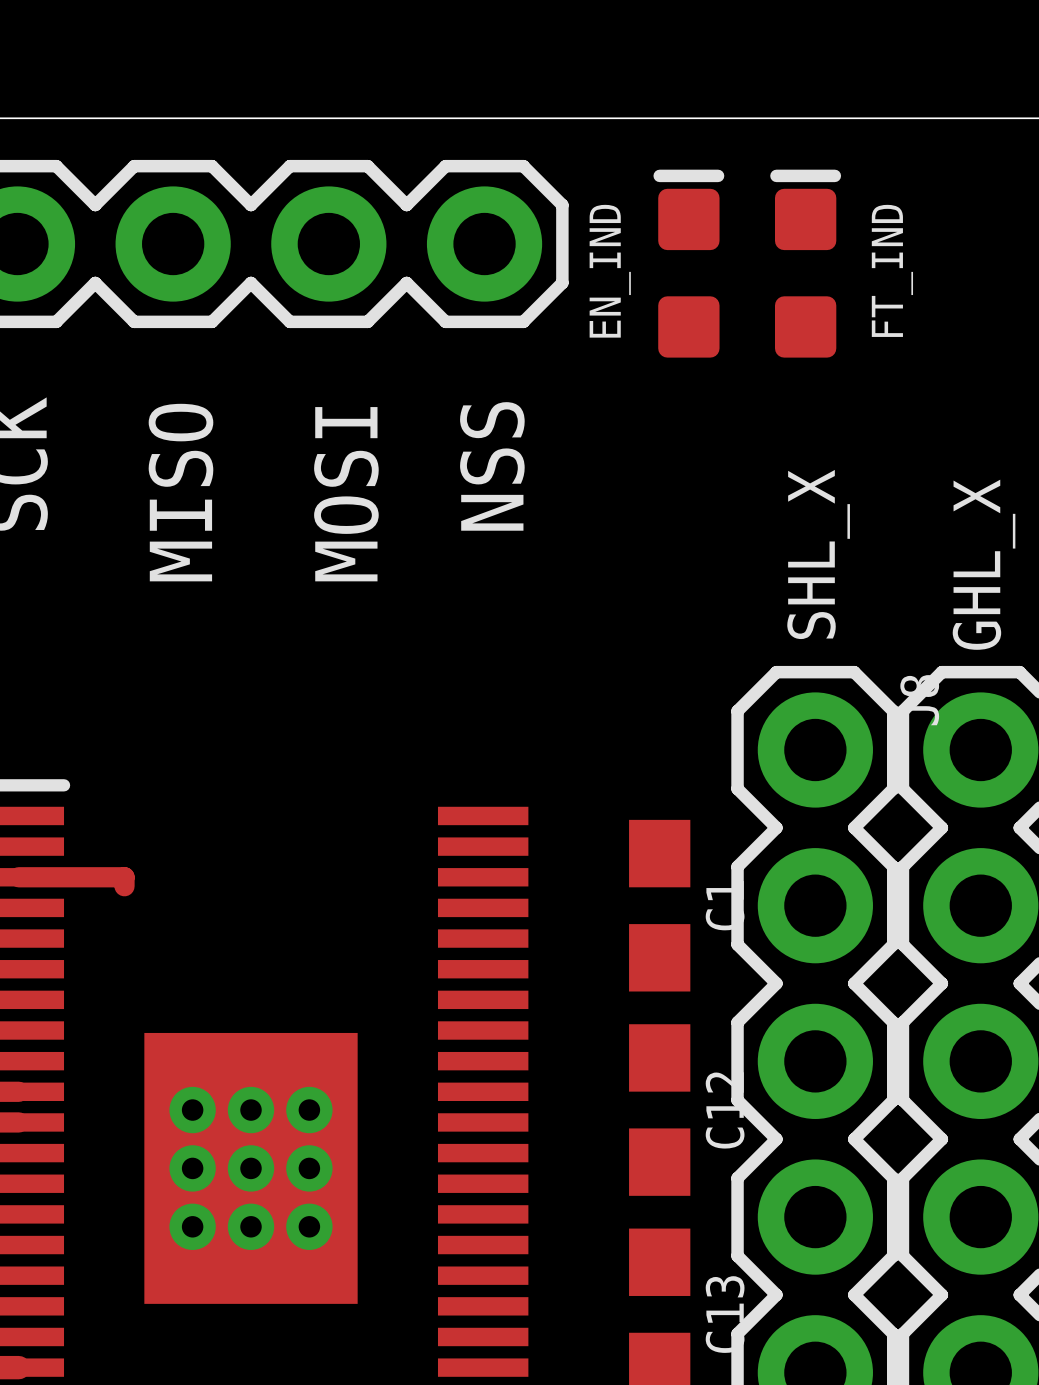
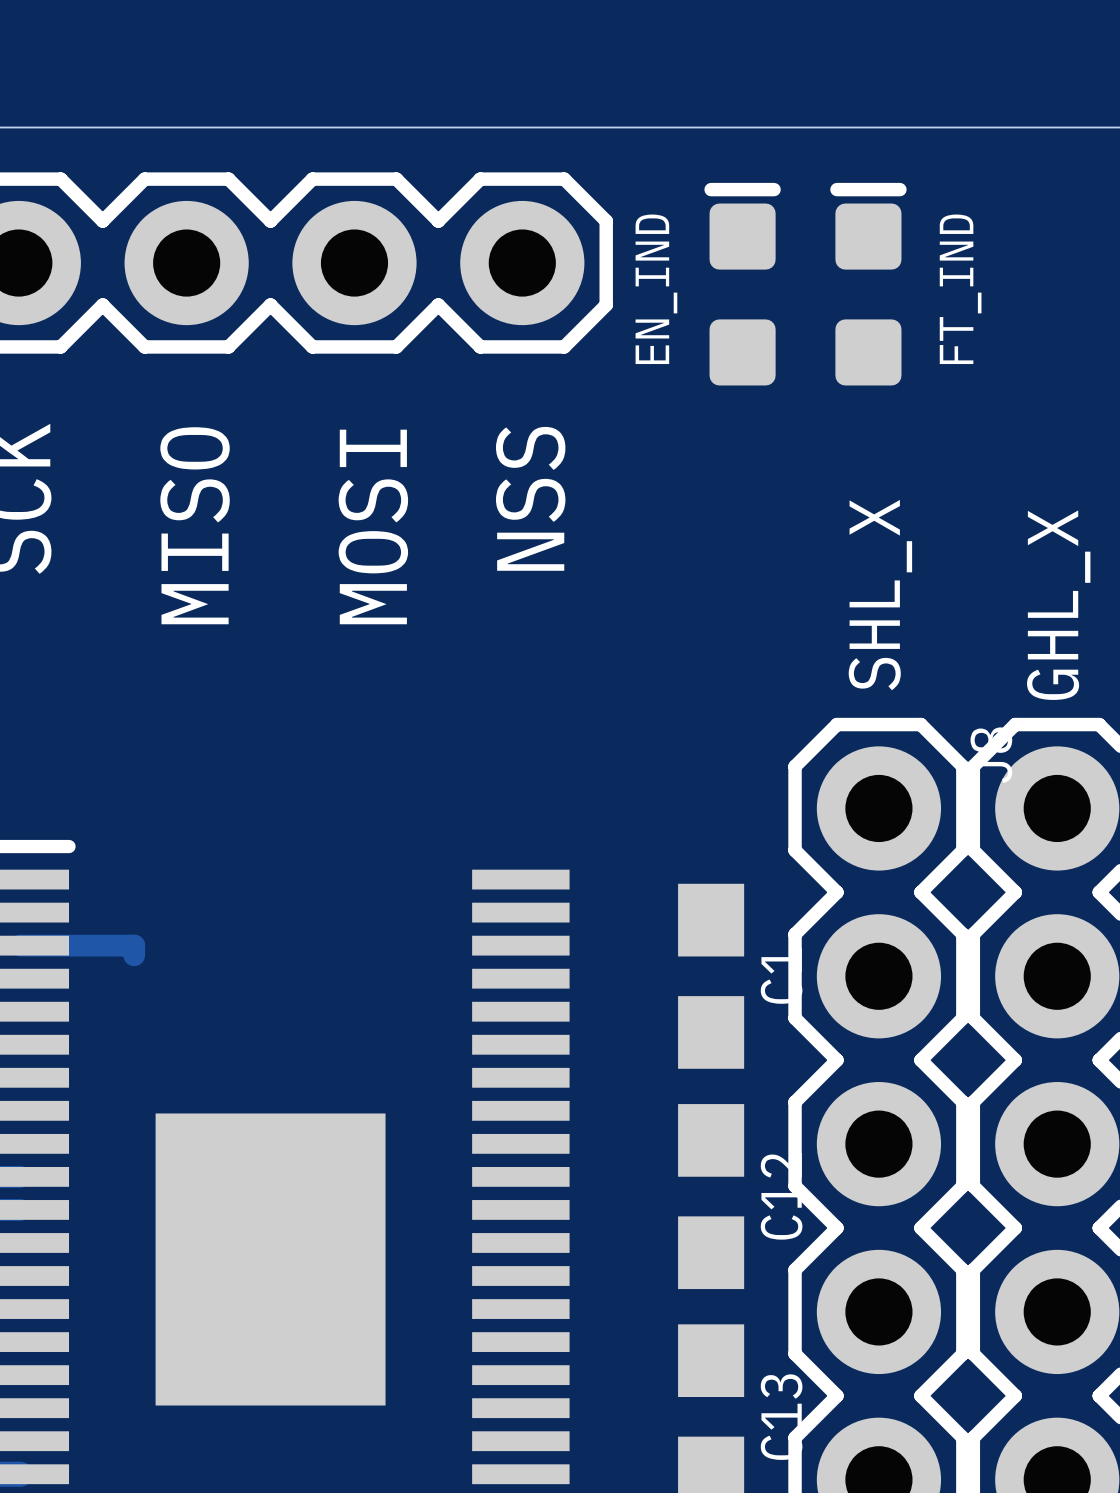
via: (192, 1110) -> none
via: (251, 1110) -> none
via: (309, 1110) -> none
via: (192, 1168) -> none
via: (251, 1168) -> none
via: (309, 1168) -> none
via: (192, 1226) -> none
via: (251, 1226) -> none
via: (309, 1226) -> none

